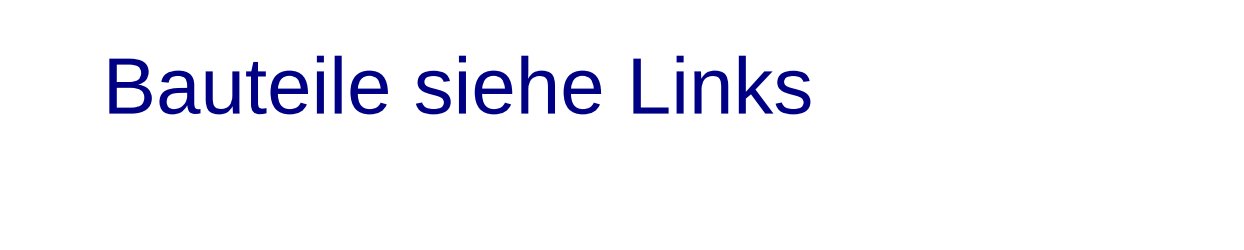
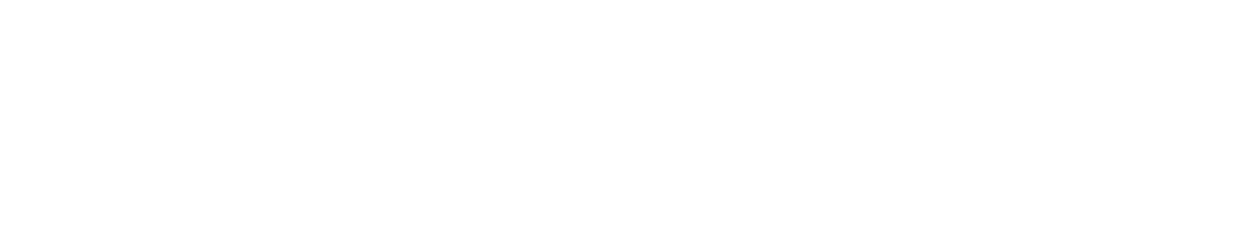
text: Bauteile siehe Links (459, 85) -> none

